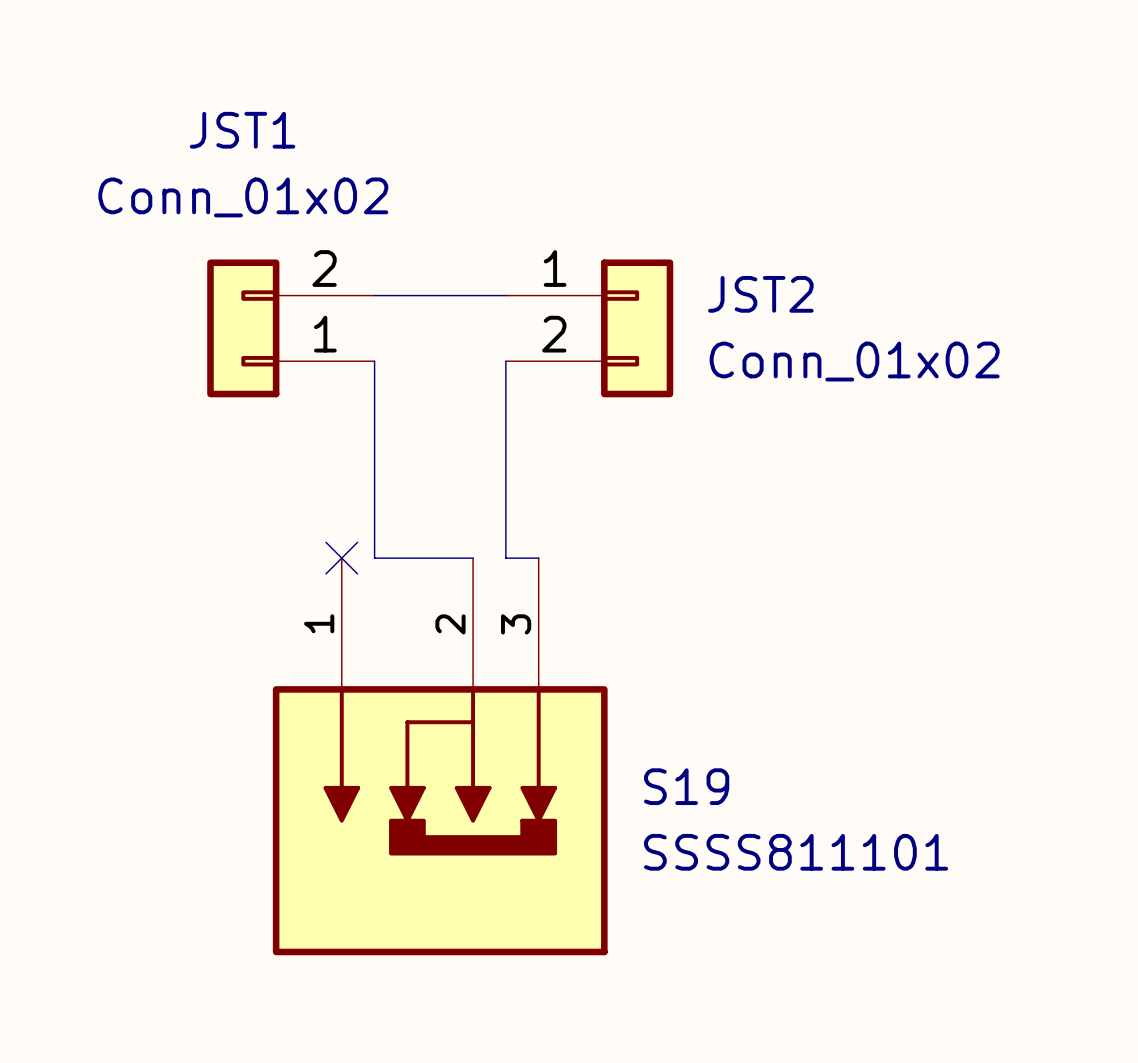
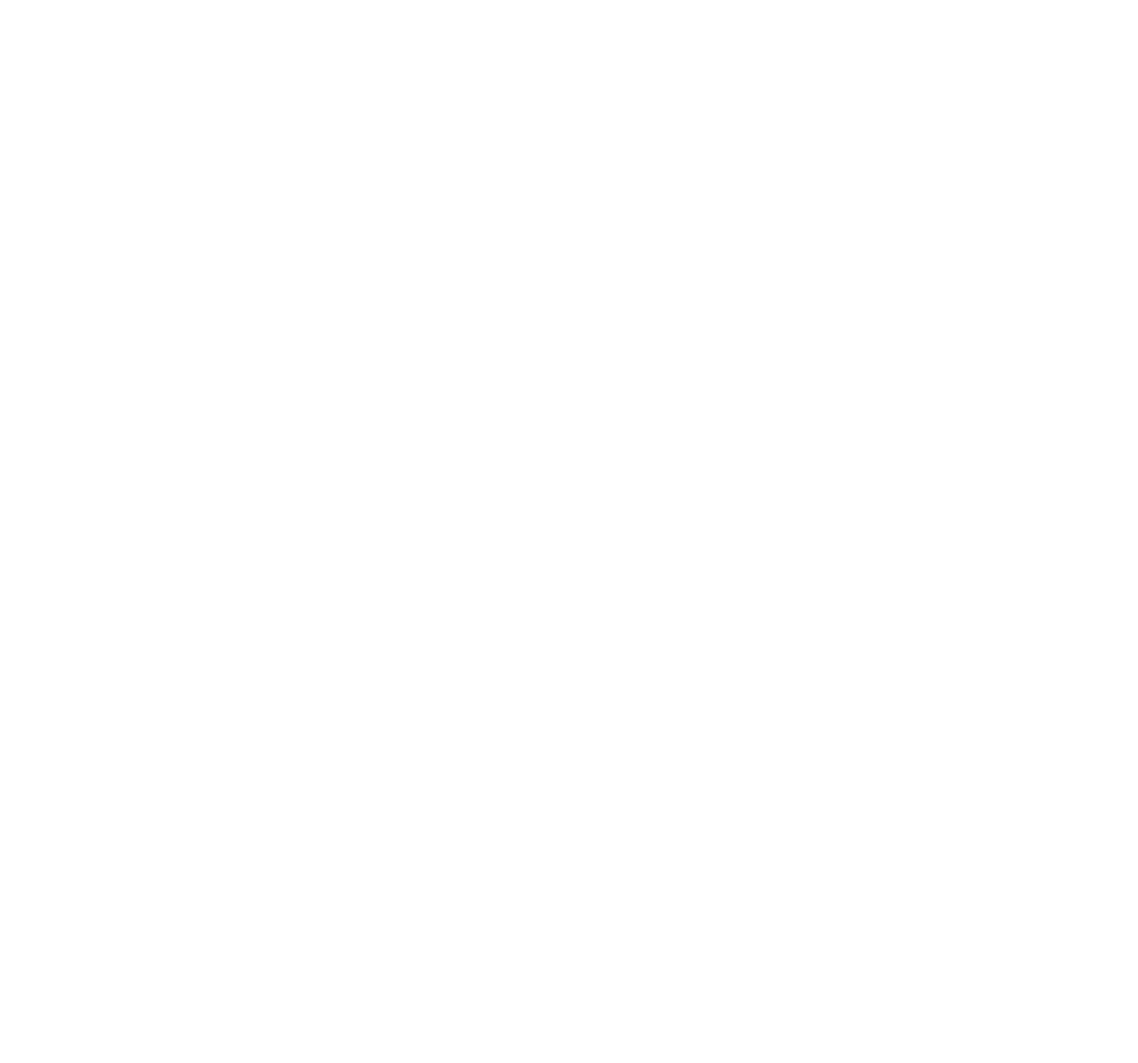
wire: (374, 295) (505, 295) -> none
JST1: Conn_01x02 (290, 328) -> none
JST2: Conn_01x02 (589, 328) -> none
wire: (374, 361) (374, 558) (473, 558) -> none
wire: (505, 361) (505, 558) (538, 558) -> none
no-connect mark: (341, 558) -> none
S19: SSSS811101 (440, 756) -> none

